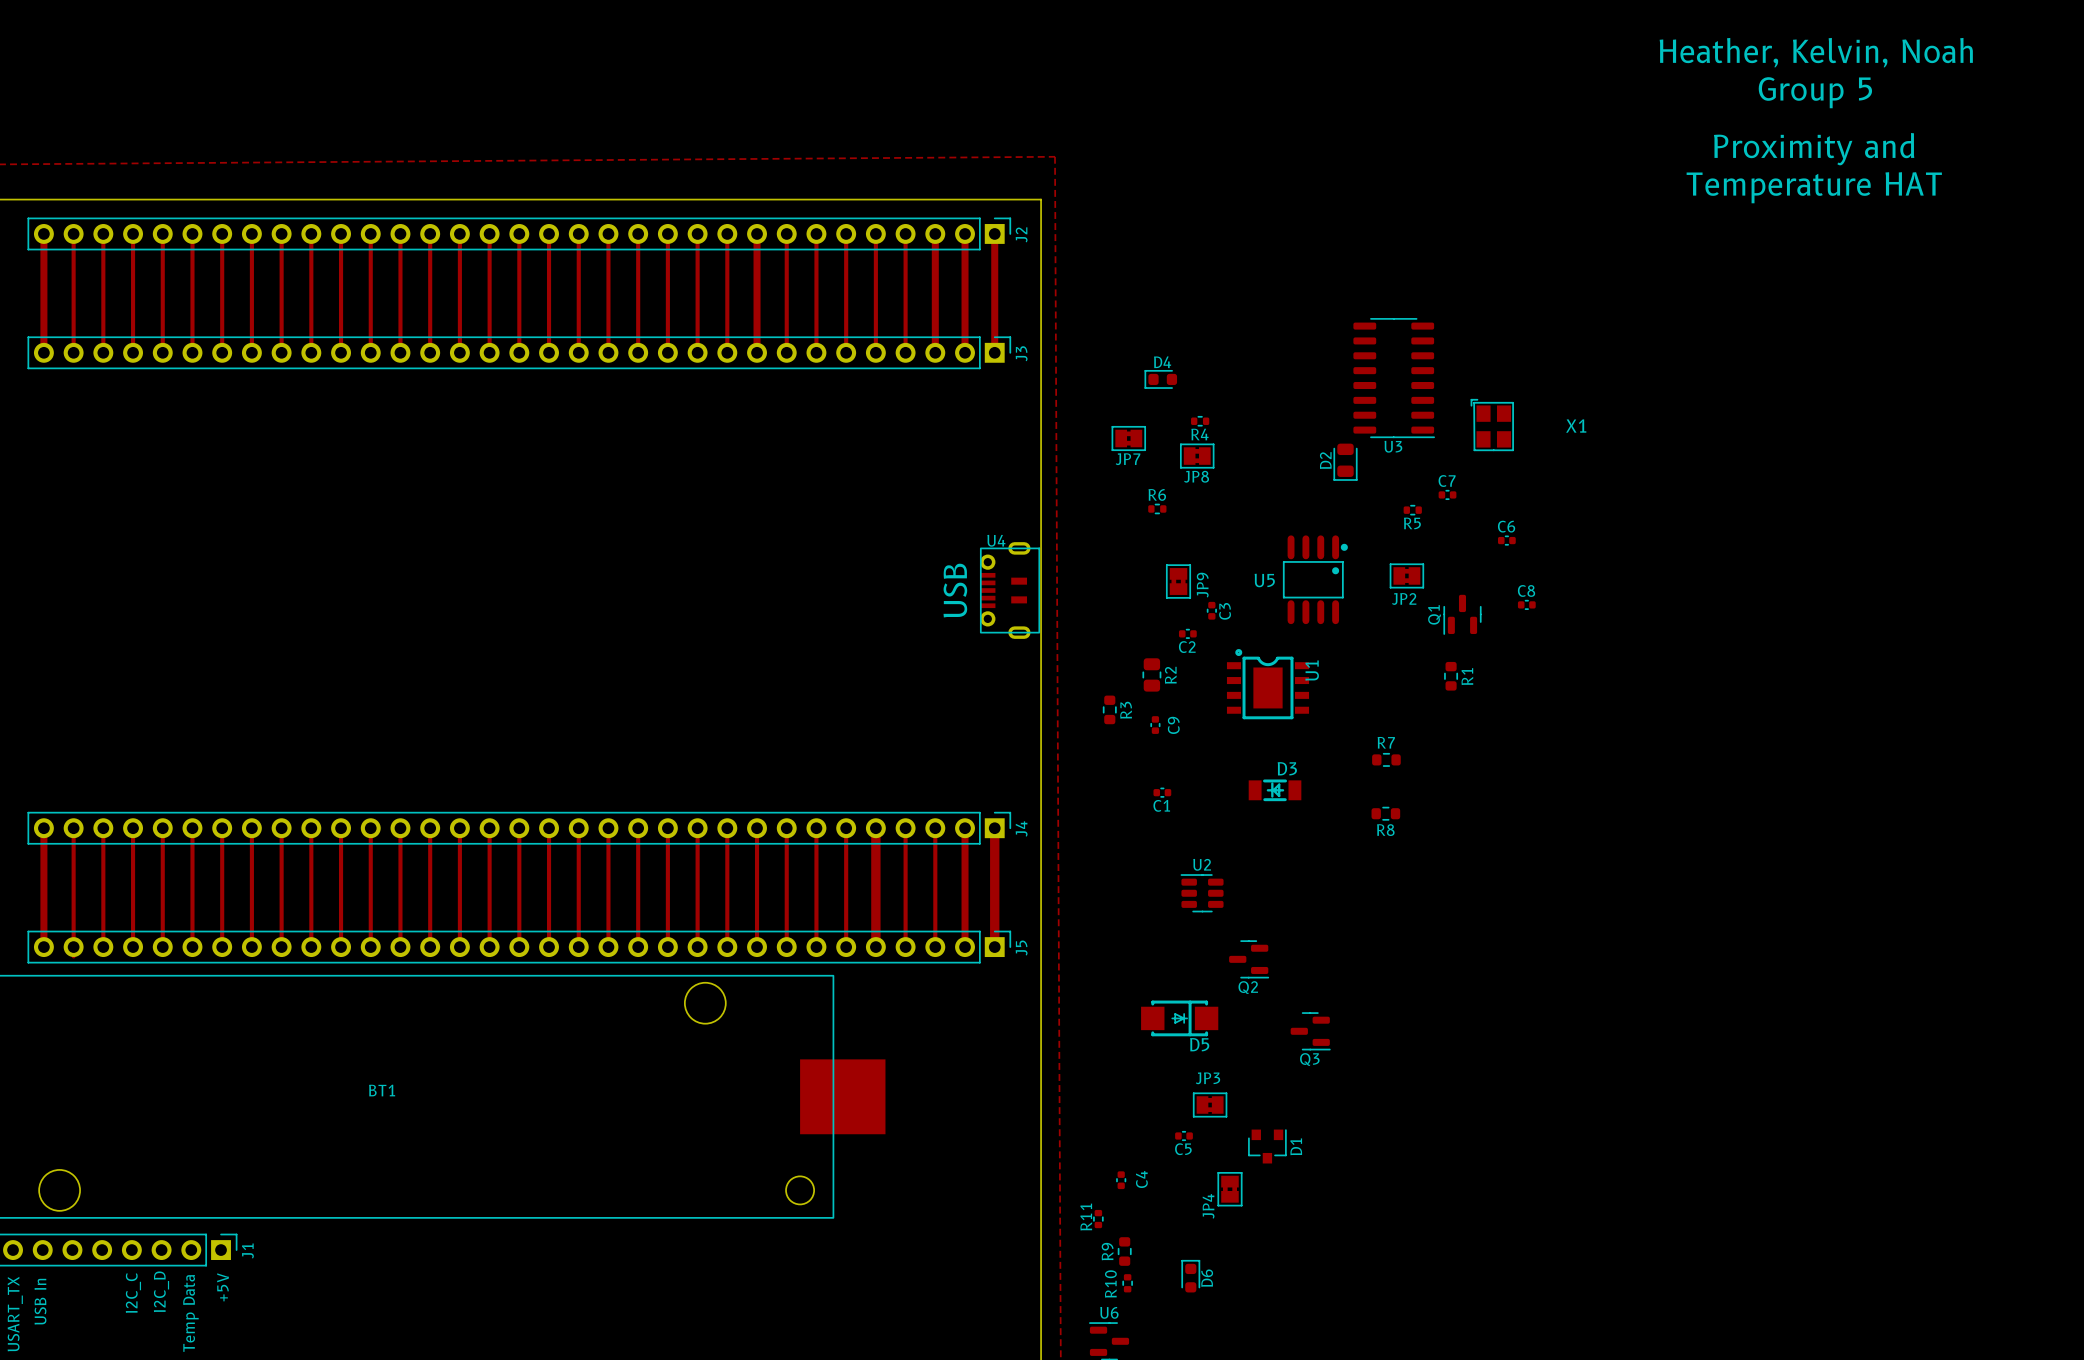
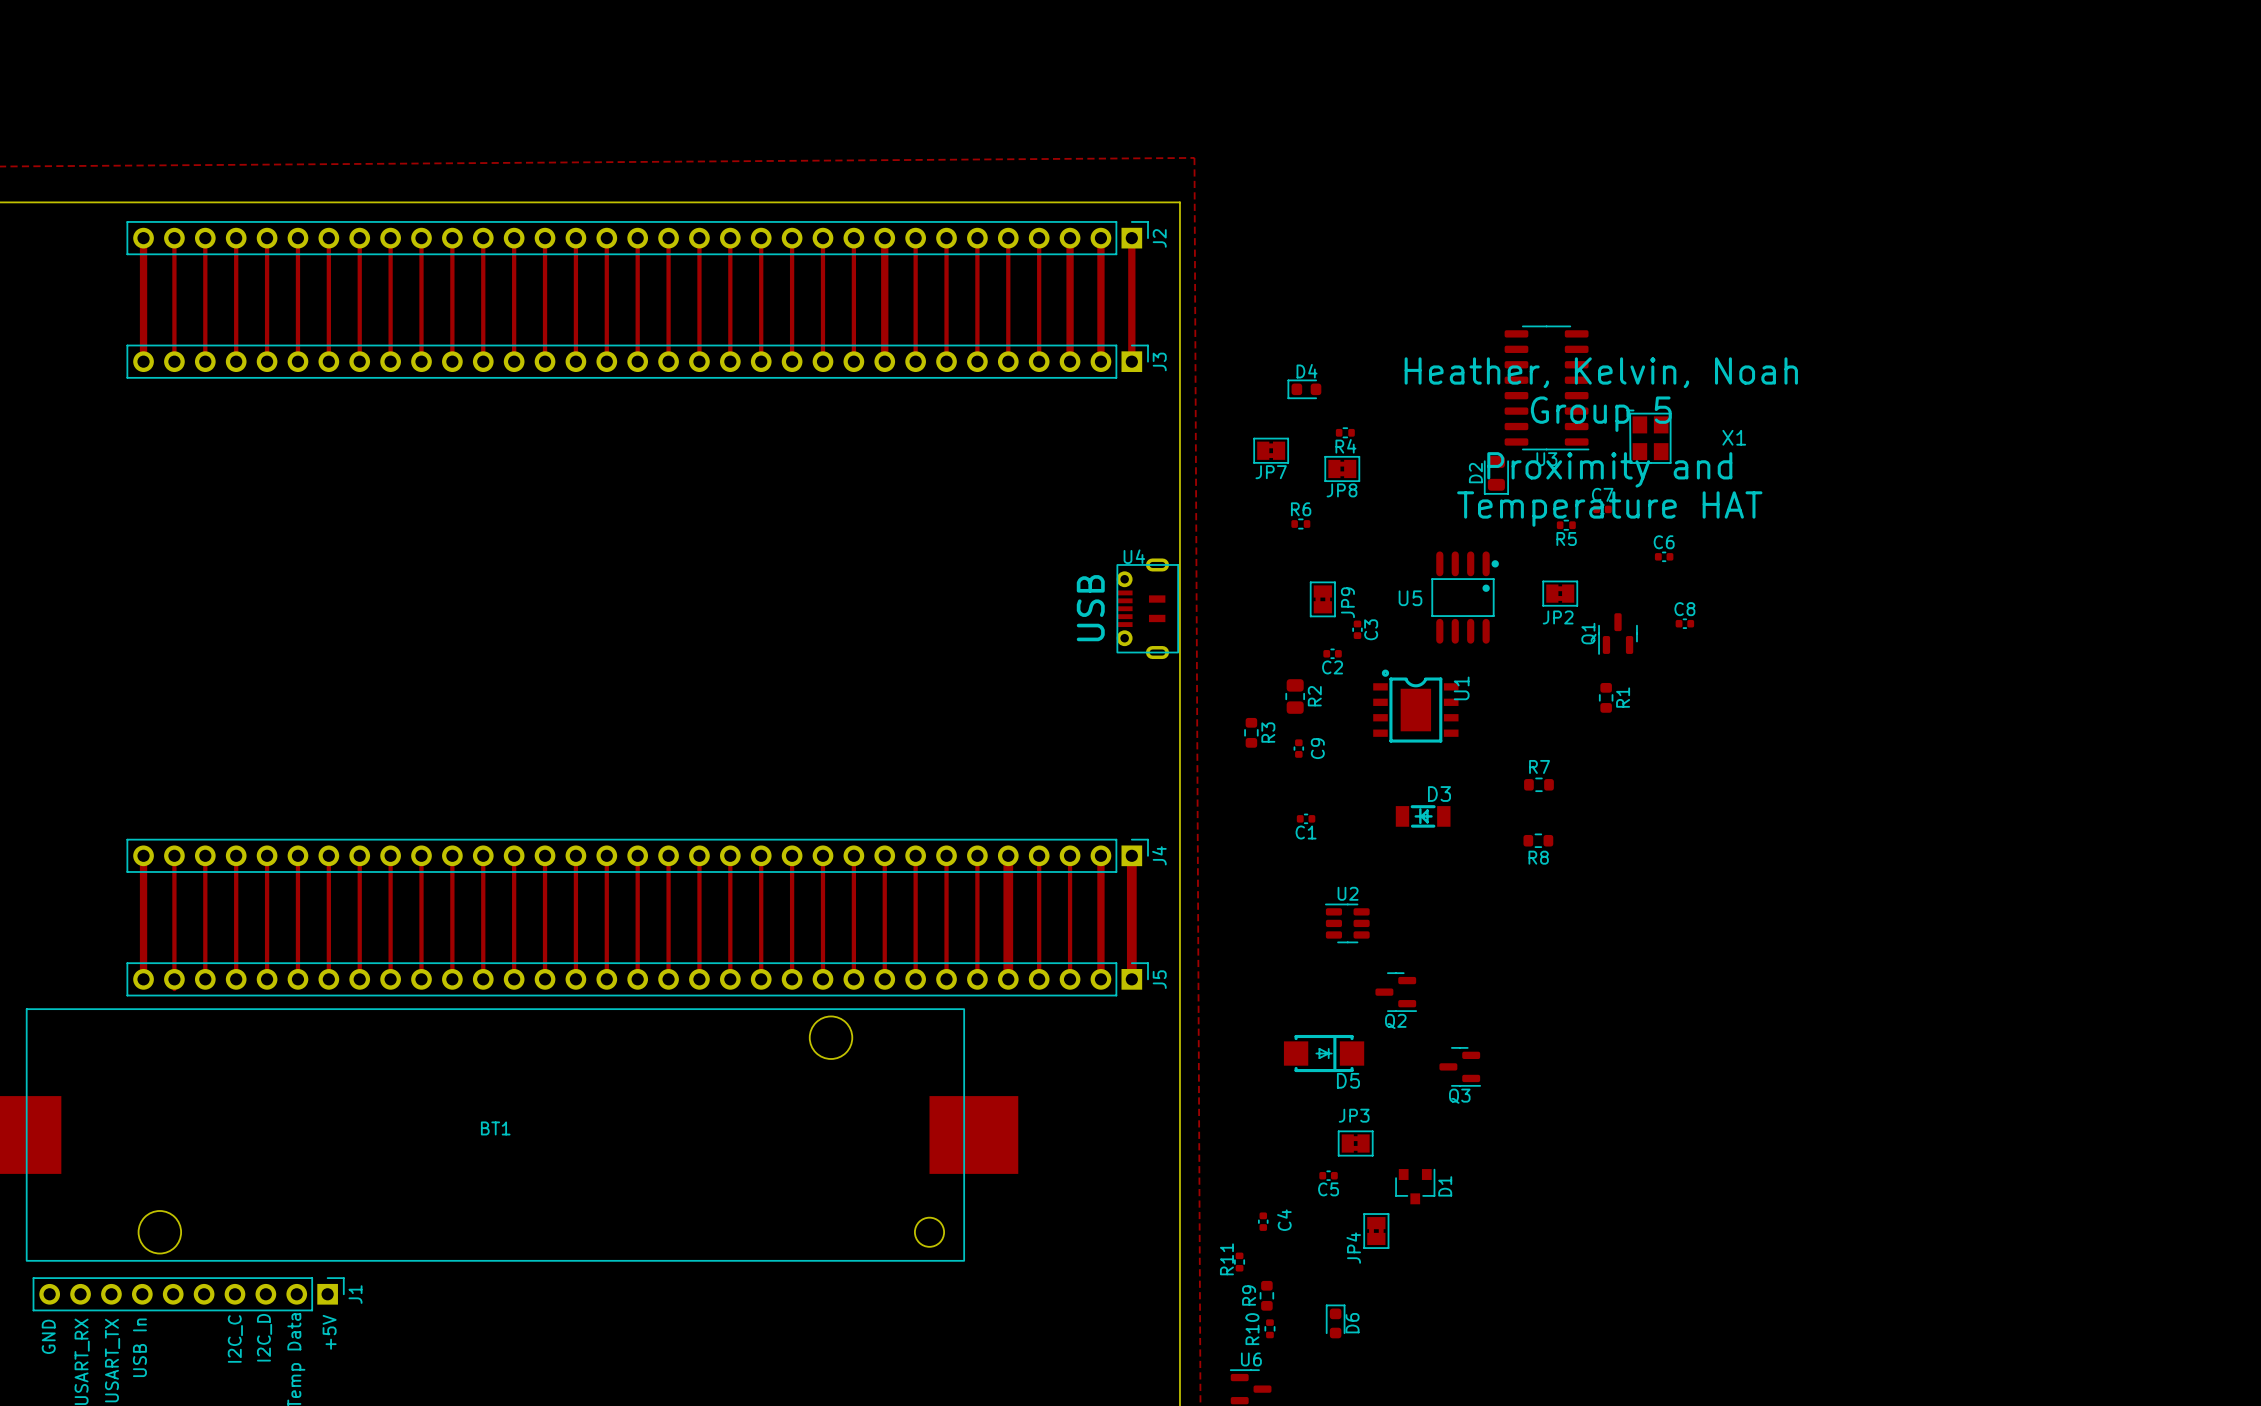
text: Heather, Kelvin, Noah (1816, 52) -> none
text: Group 5 (1815, 92) -> none
text: Proximity and (1814, 149) -> none
text: Temperature HAT (1814, 187) -> none
text: none -> Heather, Kelvin, Noah (1601, 372)
text: none -> Group 5 (1601, 414)
text: none -> Proximity and (1609, 469)
text: none -> Temperature HAT (1609, 509)

